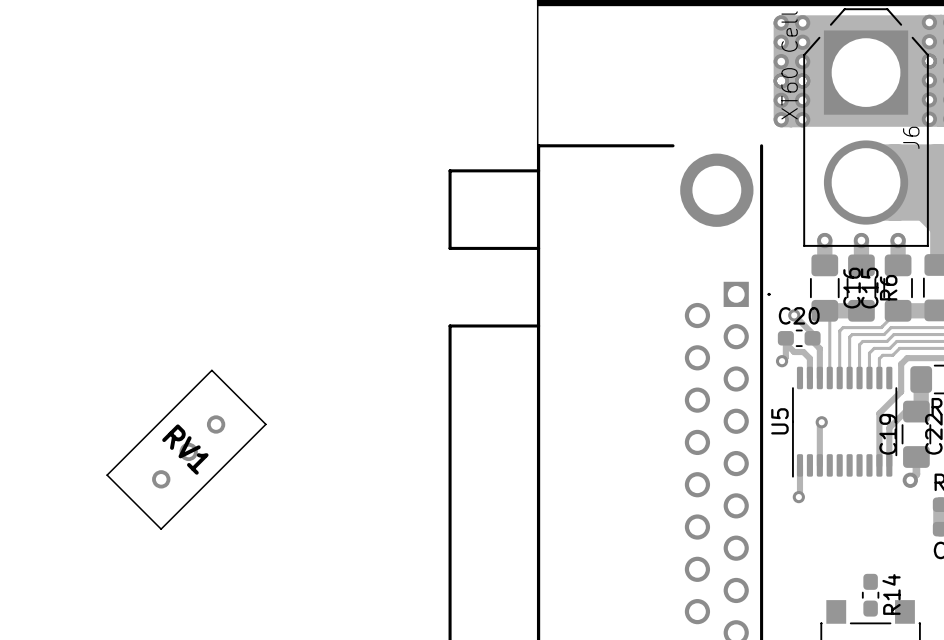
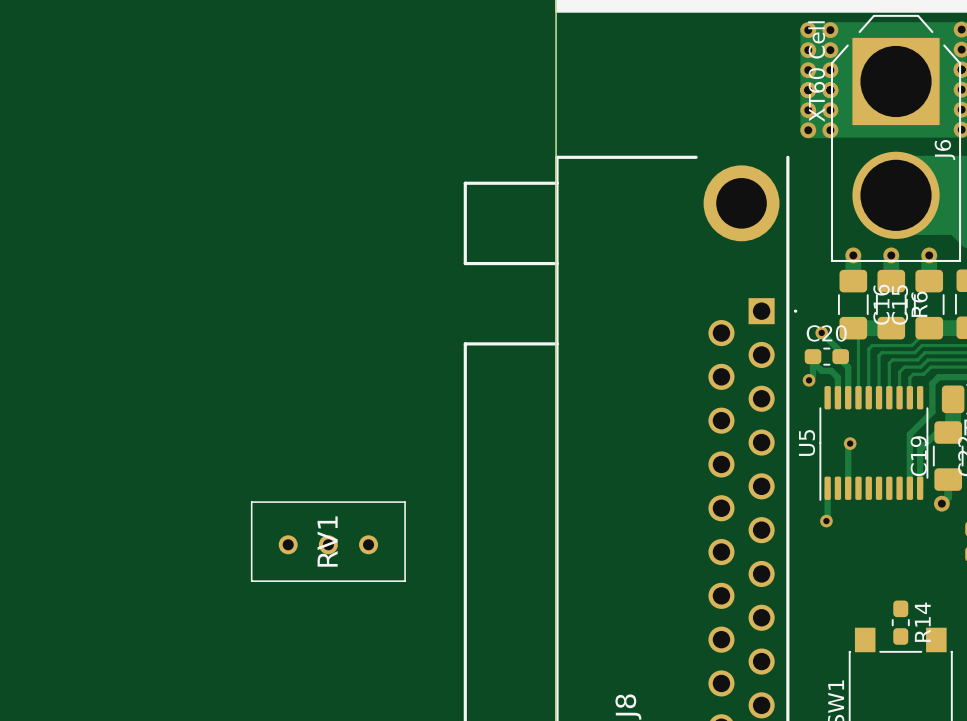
RV1 rotation: 0° (186, 449) -> 45° clockwise (328, 541)
RV1 position: (186, 449) -> (328, 541)

